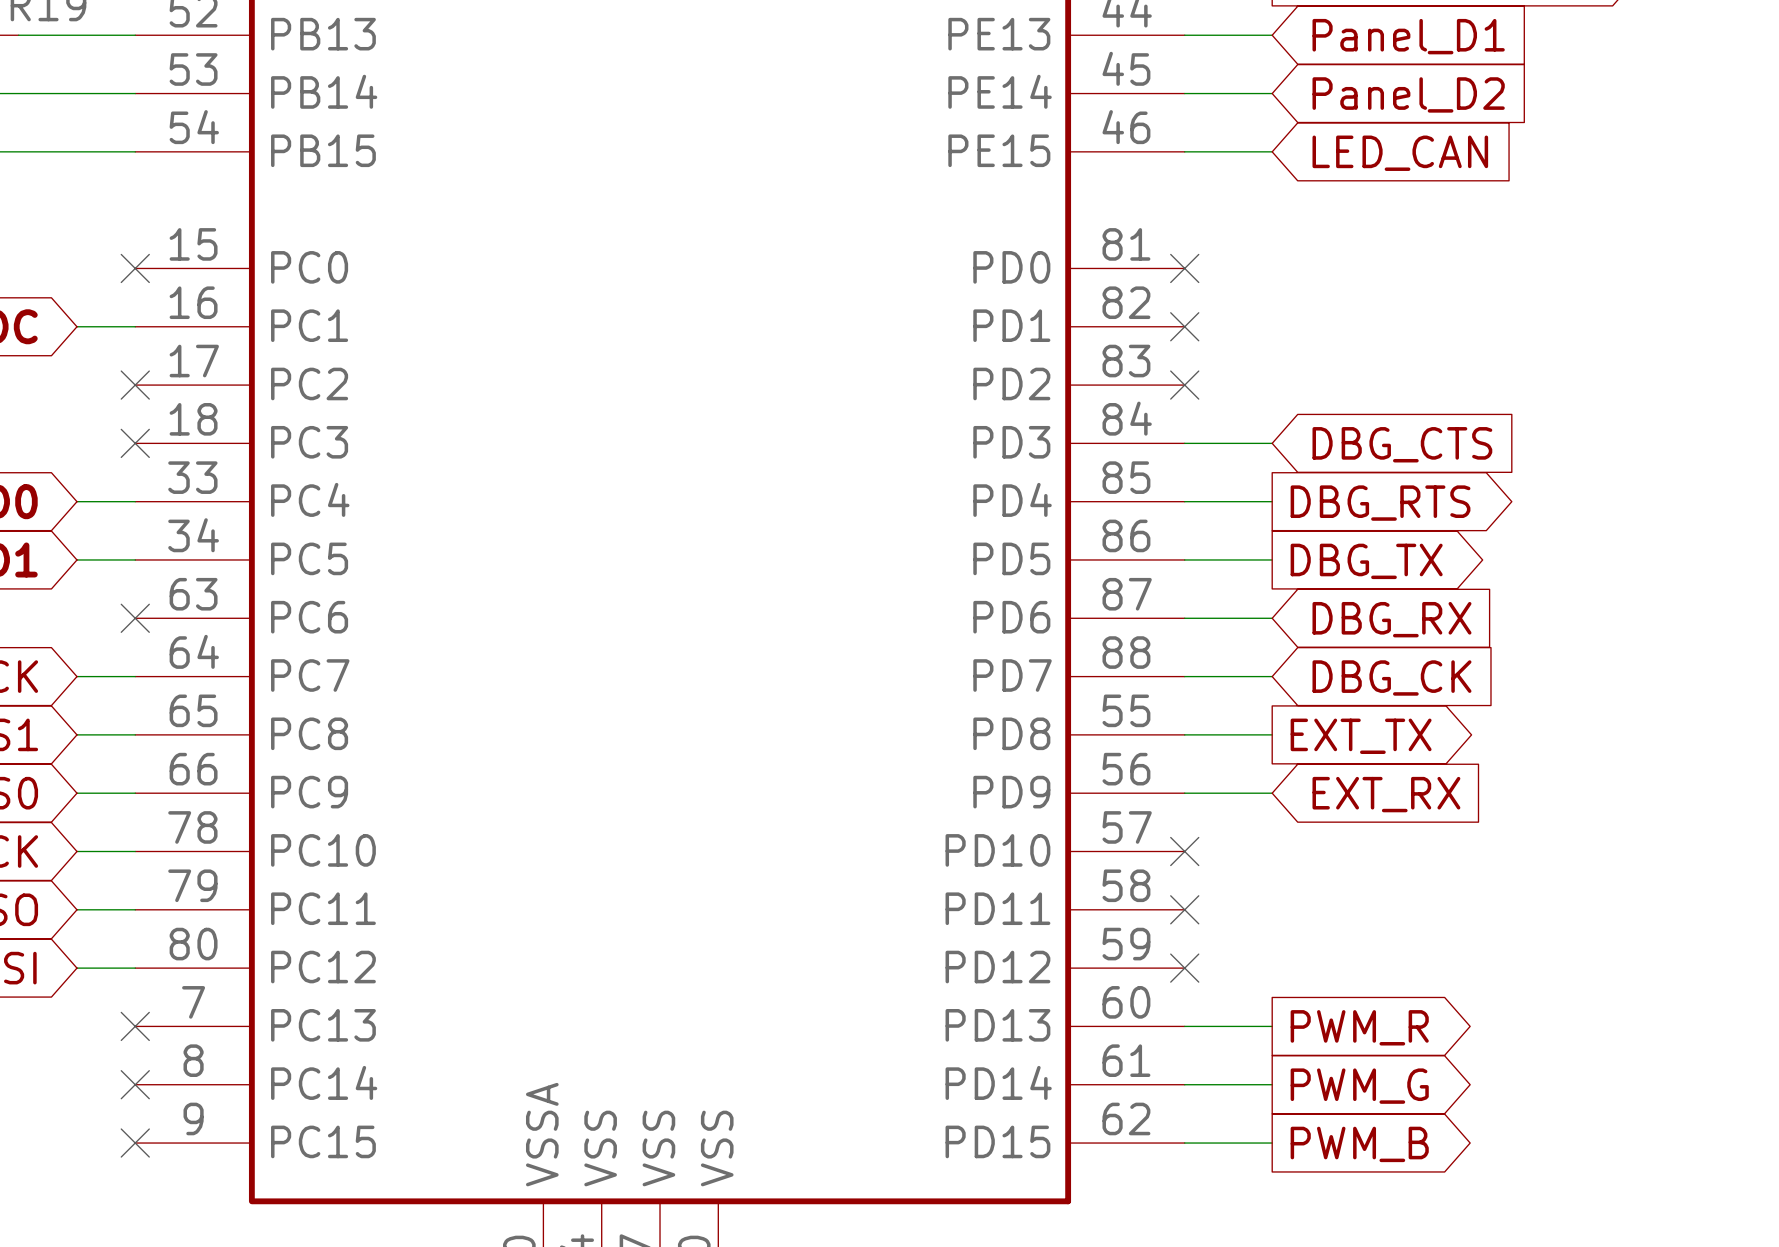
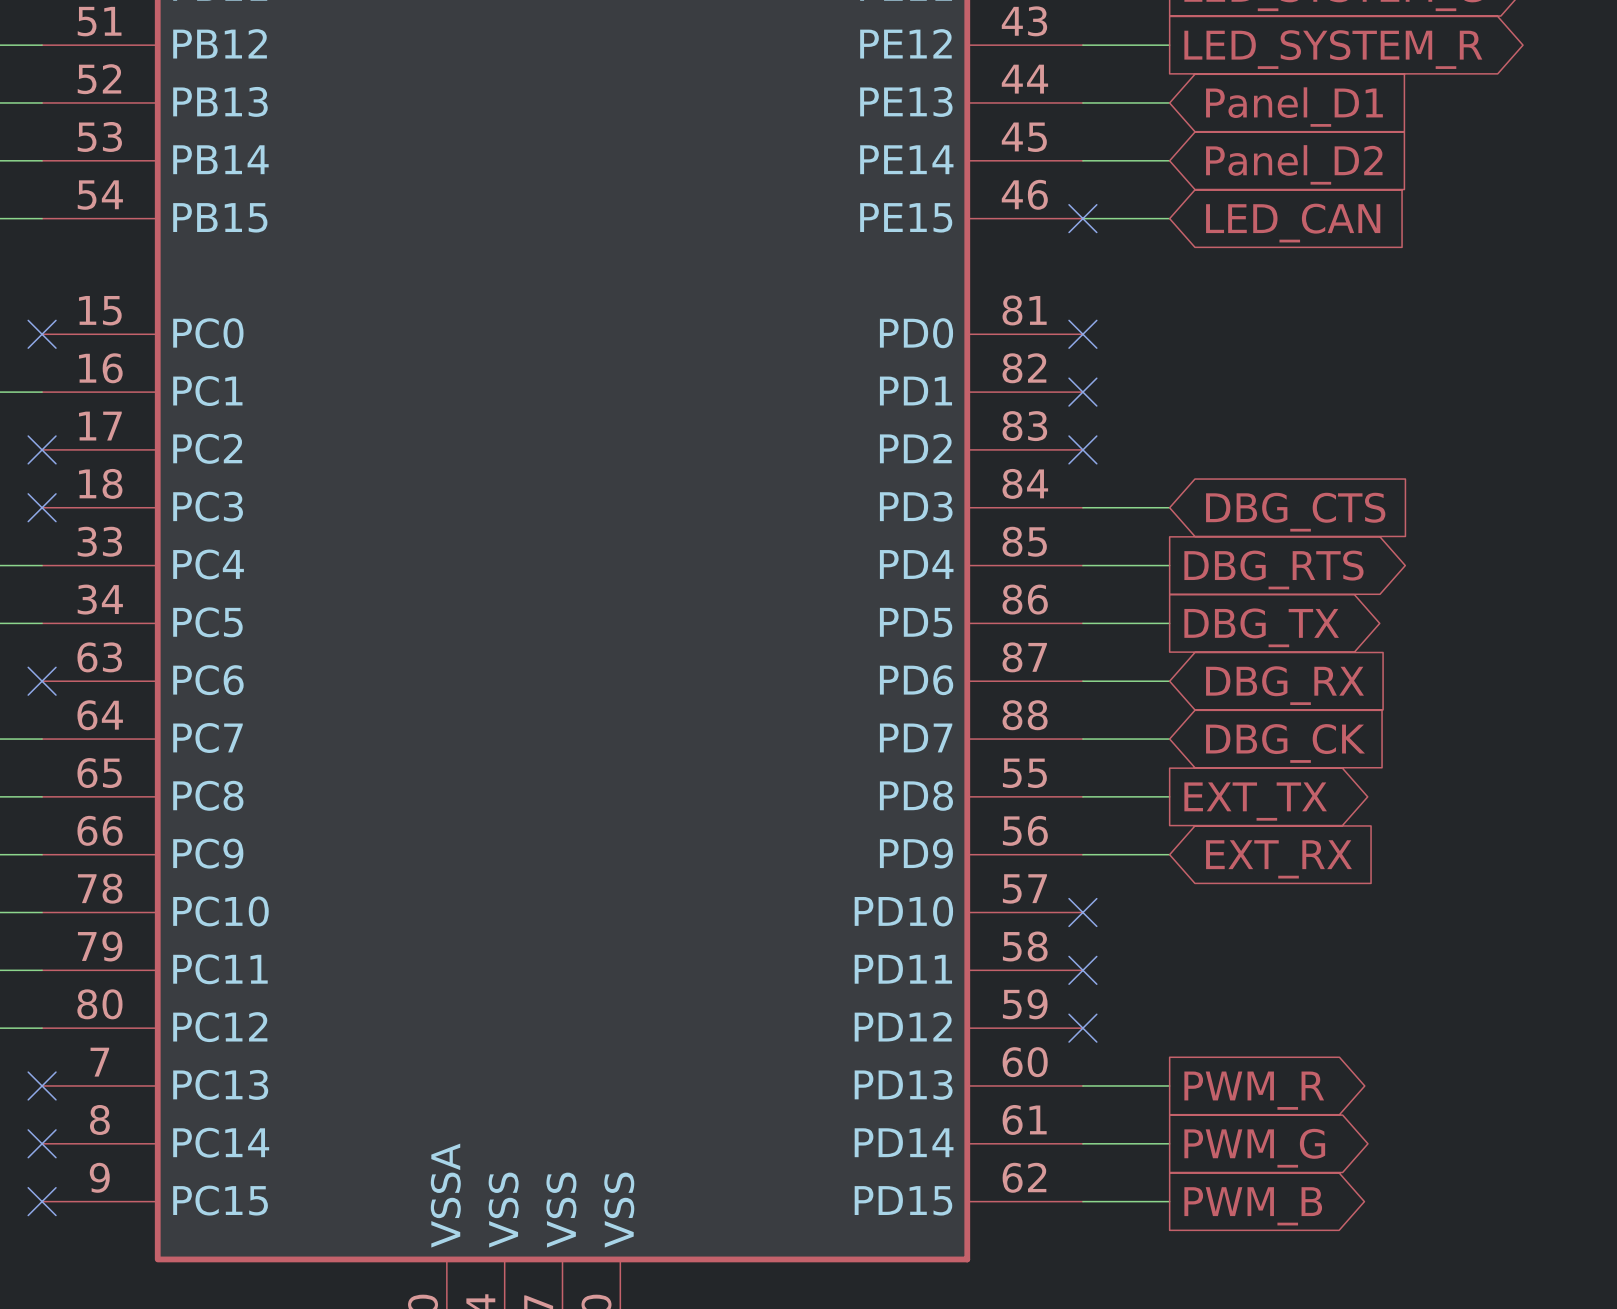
no-connect mark: none -> (1082, 218)

